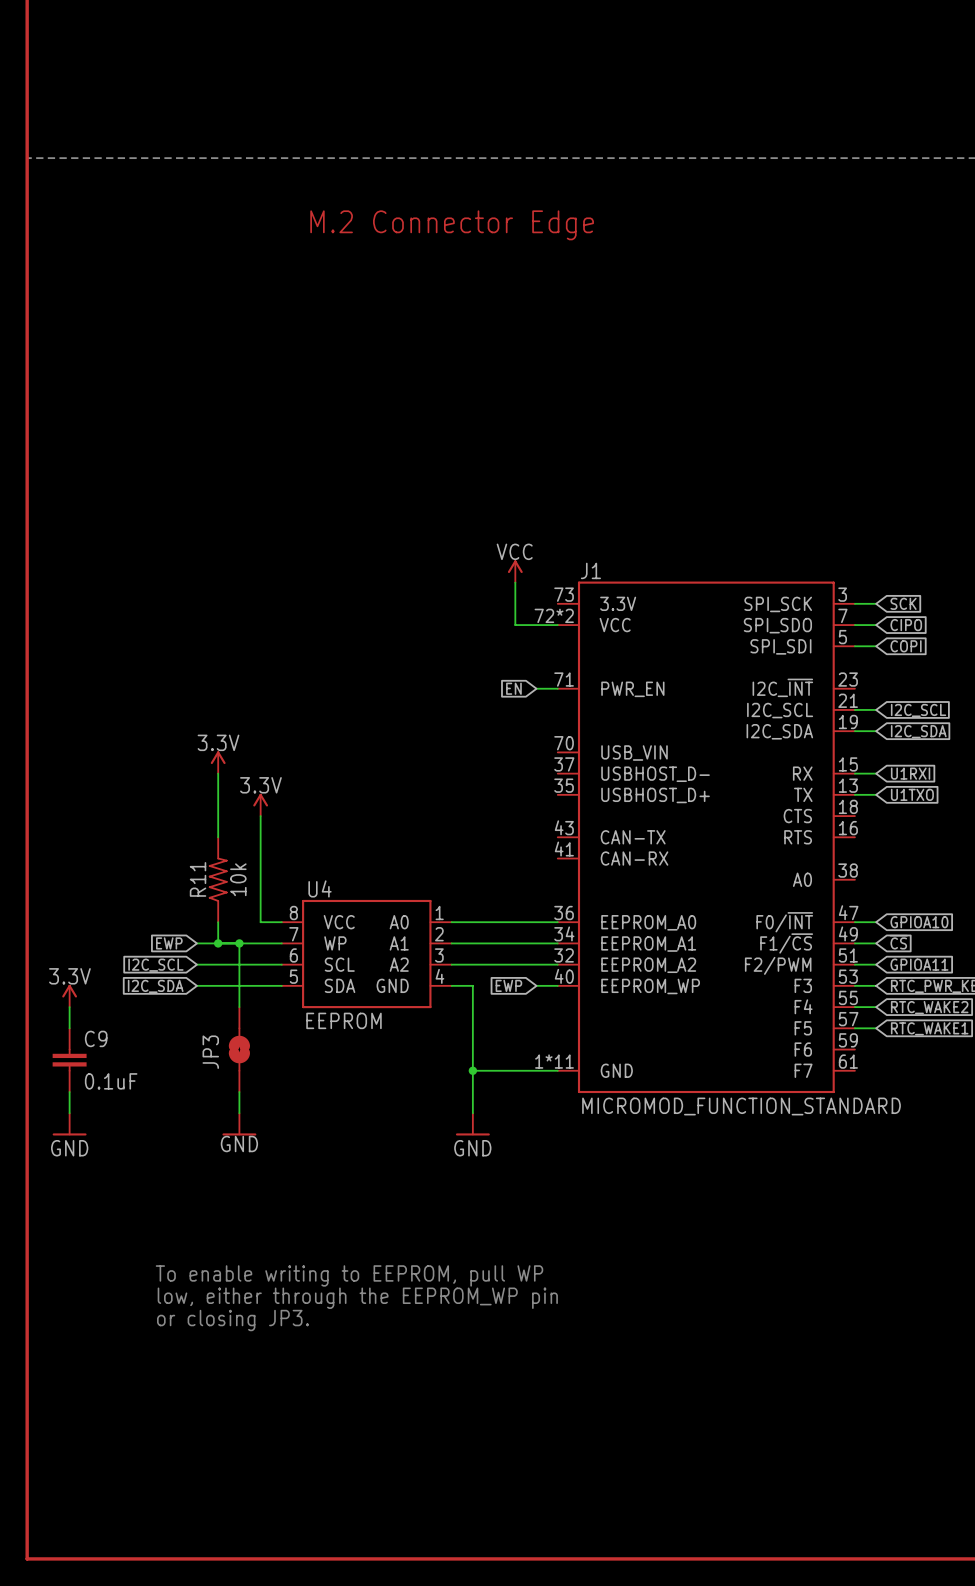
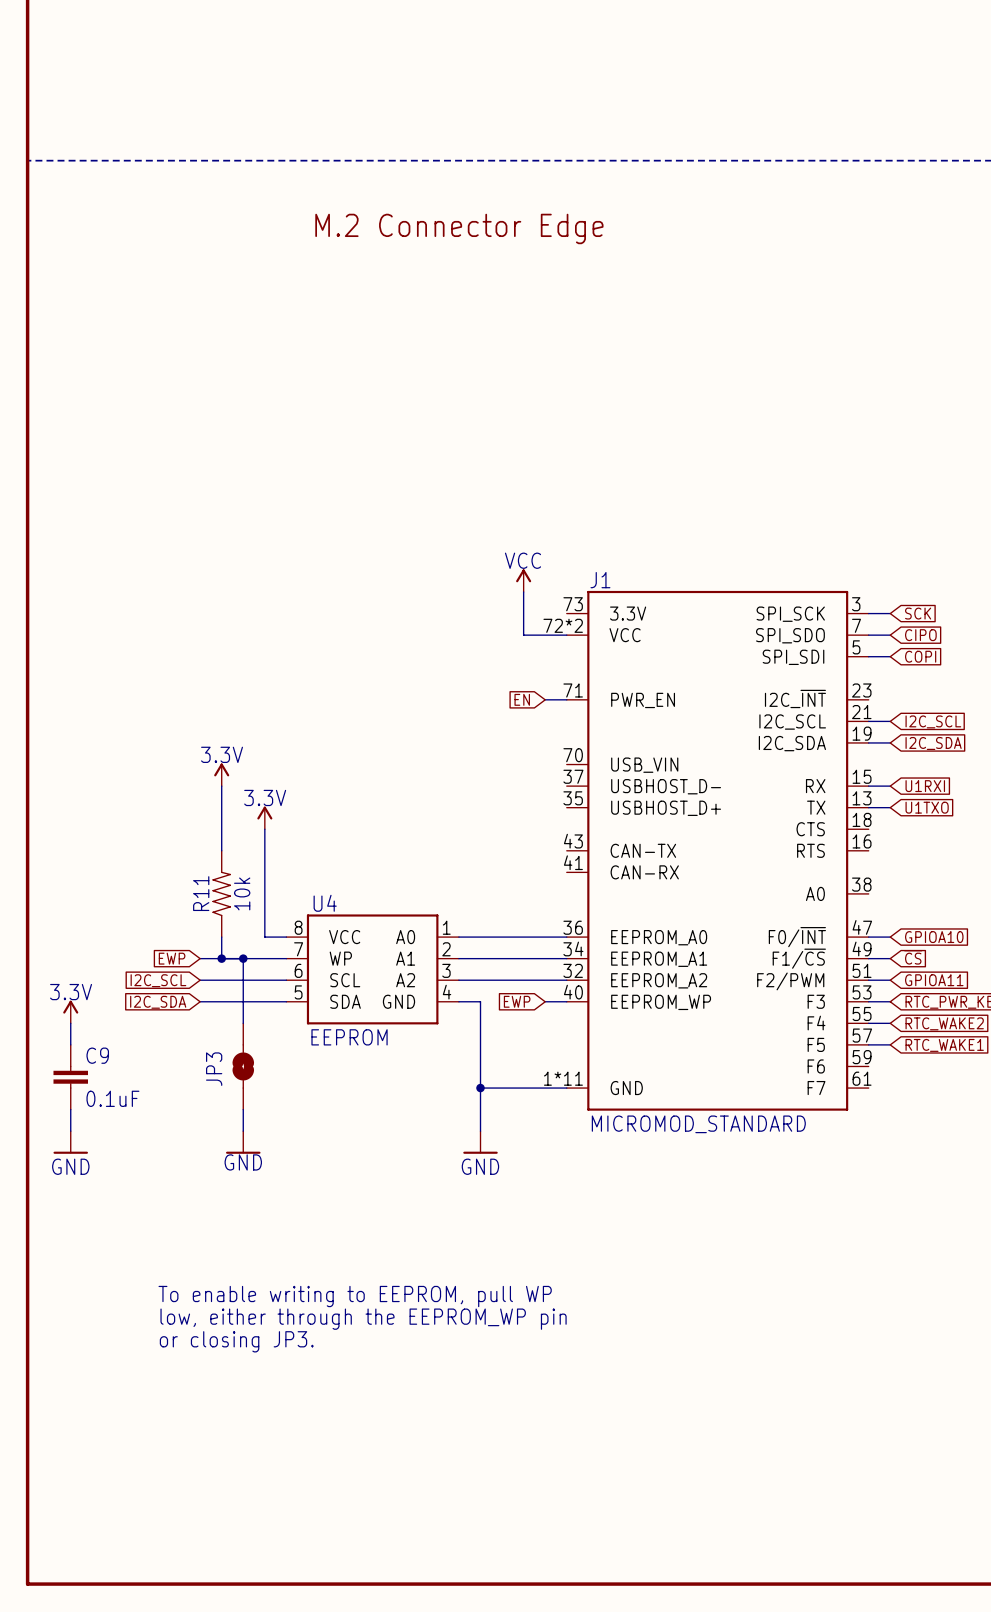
J1 value: MICROMOD_FUNCTION_STANDARD (741, 1106) -> MICROMOD_STANDARD (698, 1124)

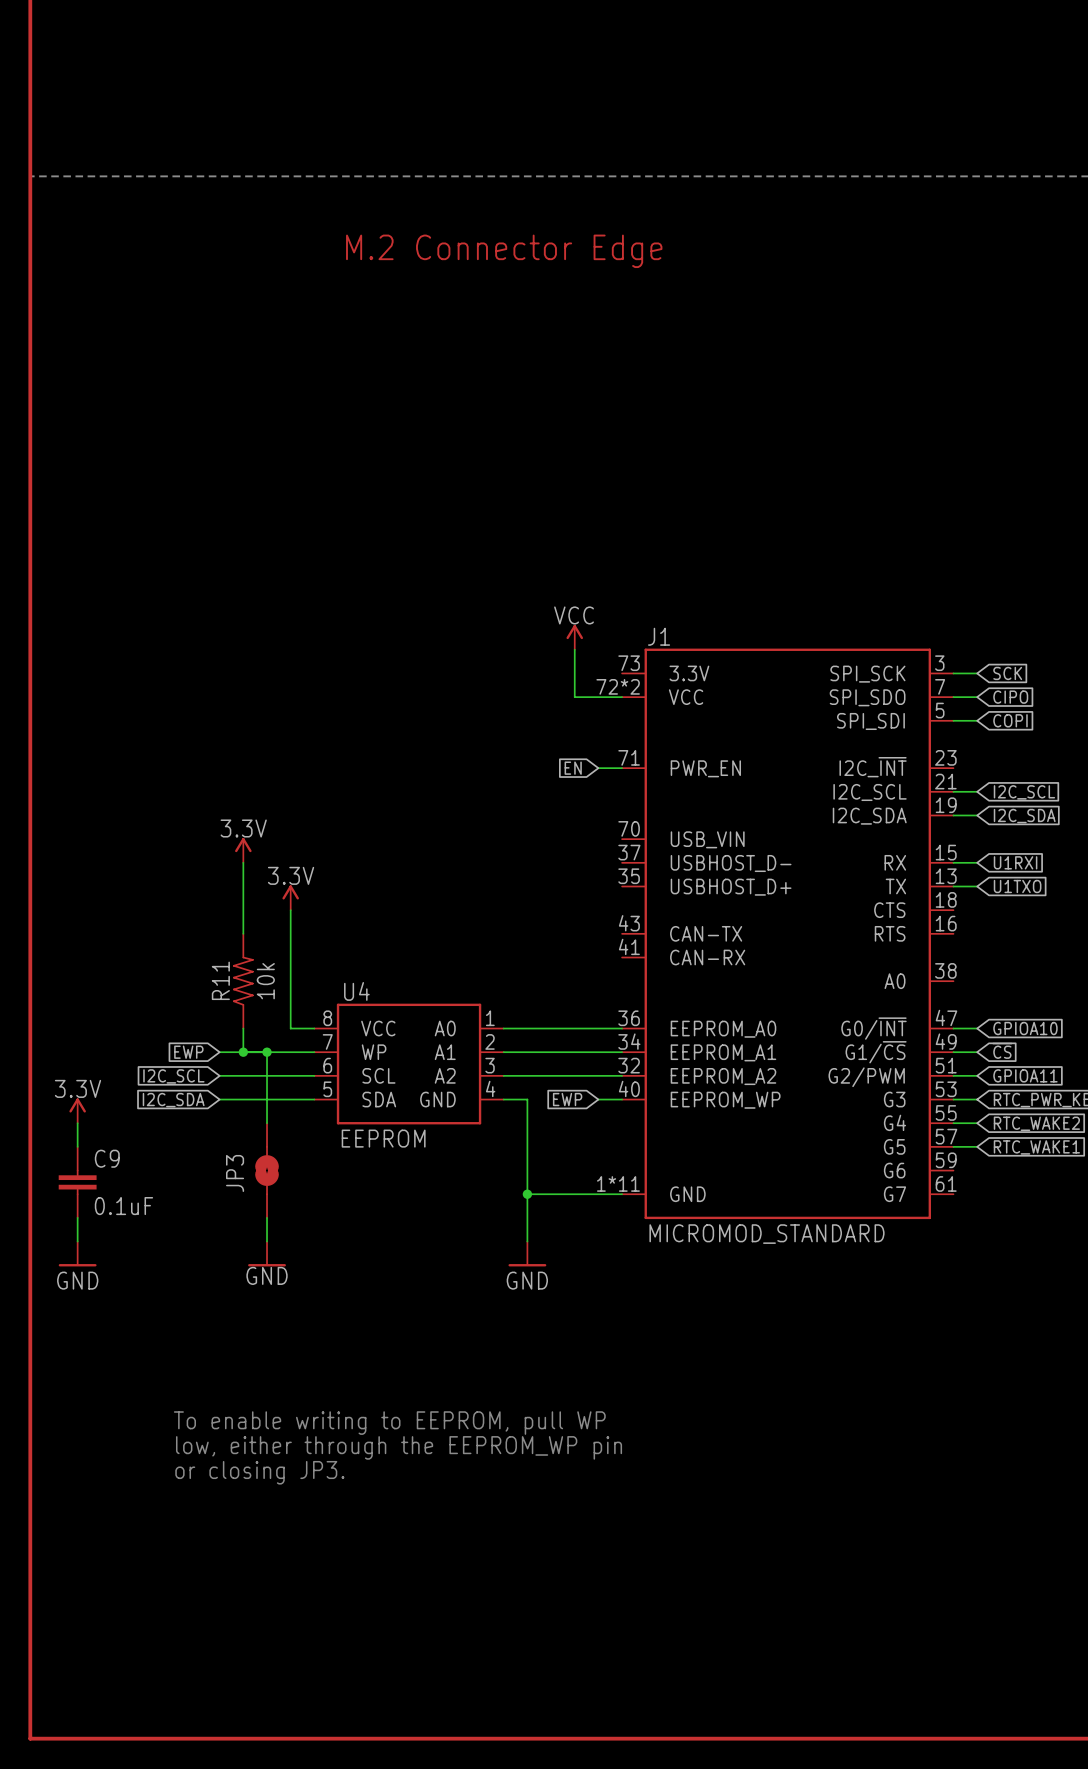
J1 pin name: F0/~{INT} (797, 937) -> G0/~{INT} (873, 1028)
J1 pin name: F1/~{CS} (799, 958) -> G1/~{CS} (876, 1052)
J1 pin name: F2/PWM (790, 981) -> G2/PWM (866, 1077)
J1 pin name: F3 (816, 1001) -> G3 (894, 1099)
J1 pin name: F4 (816, 1023) -> G4 (894, 1122)
J1 pin name: F5 (816, 1044) -> G5 (894, 1146)
J1 pin name: F6 (816, 1066) -> G6 (894, 1170)
J1 pin name: F7 (816, 1088) -> G7 (894, 1194)

